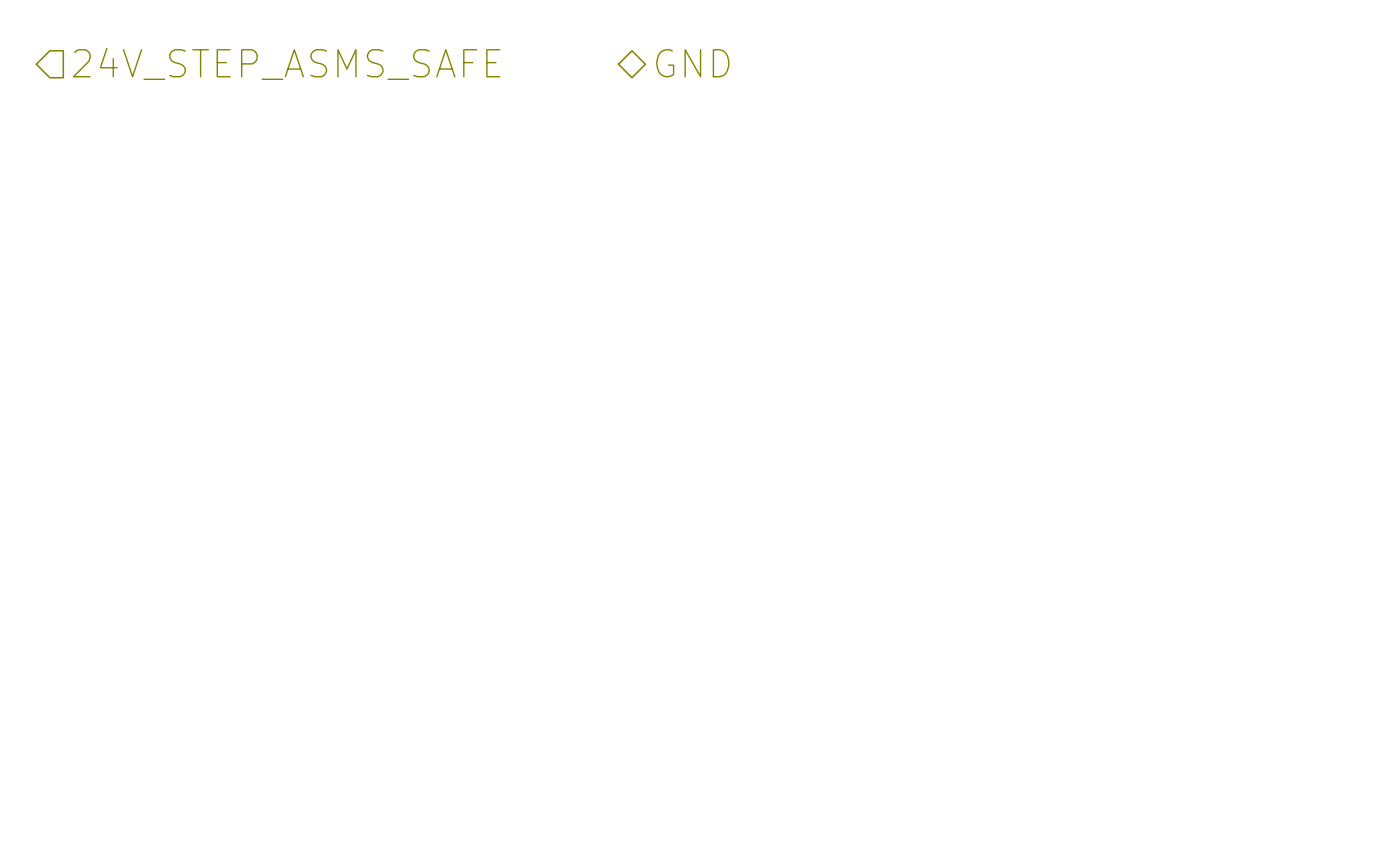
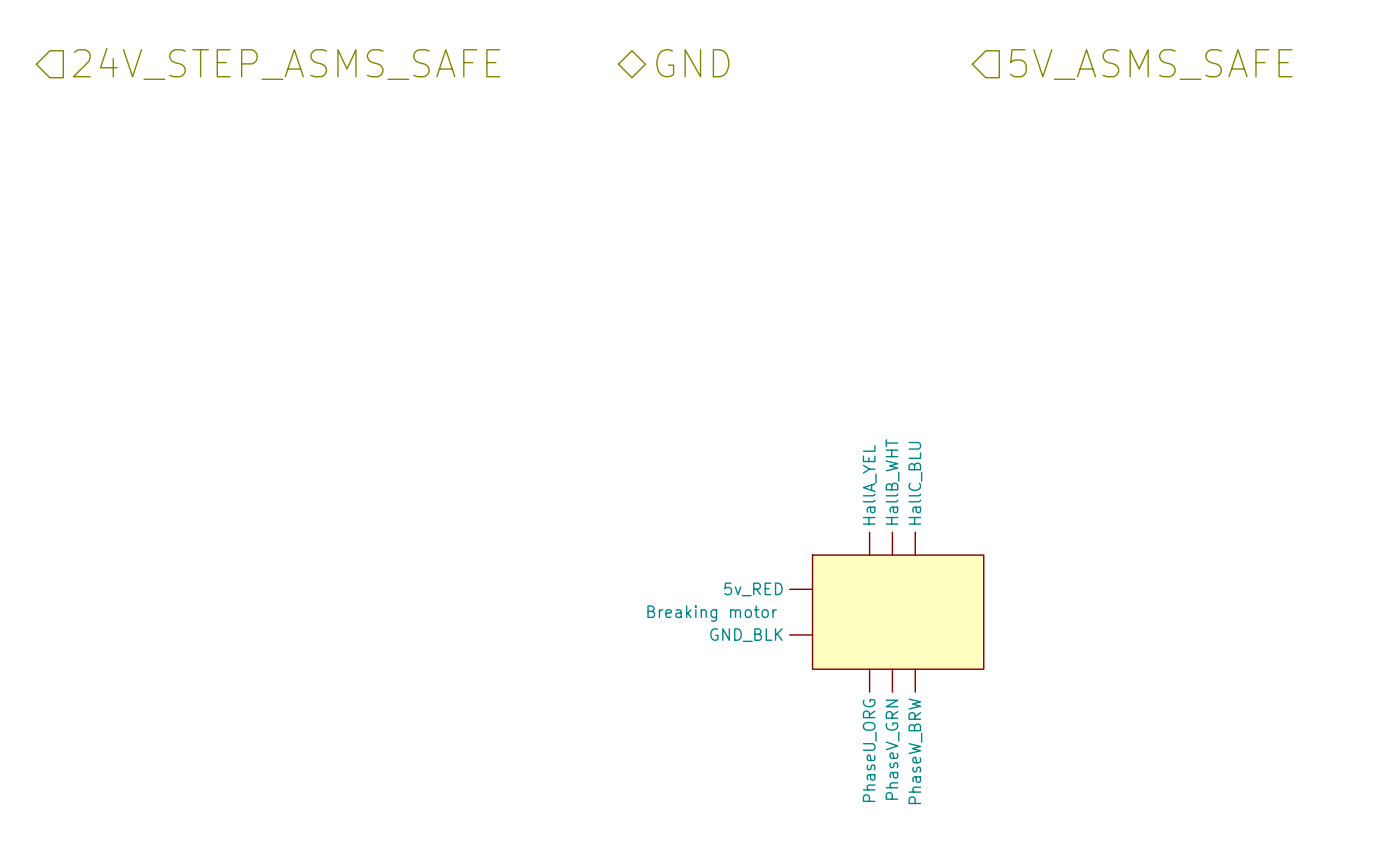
hierarchical label: none -> 5V_ASMS_SAFE (1151, 64)
part: none -> Breaking motor (886, 612)

